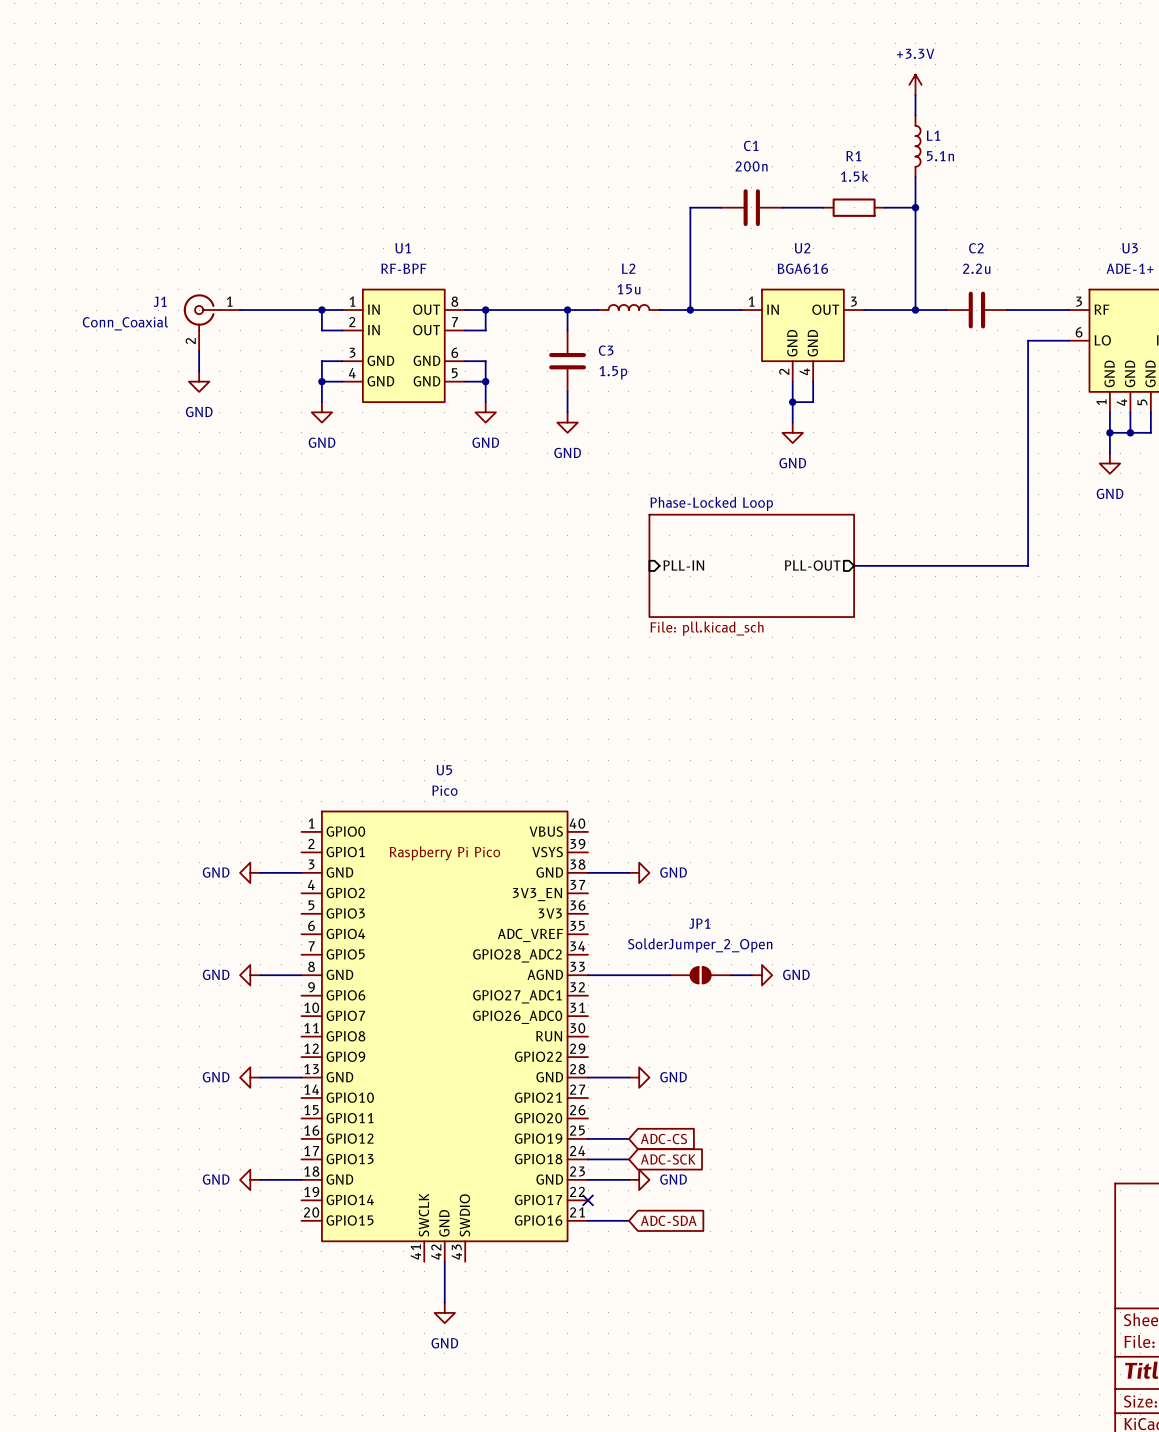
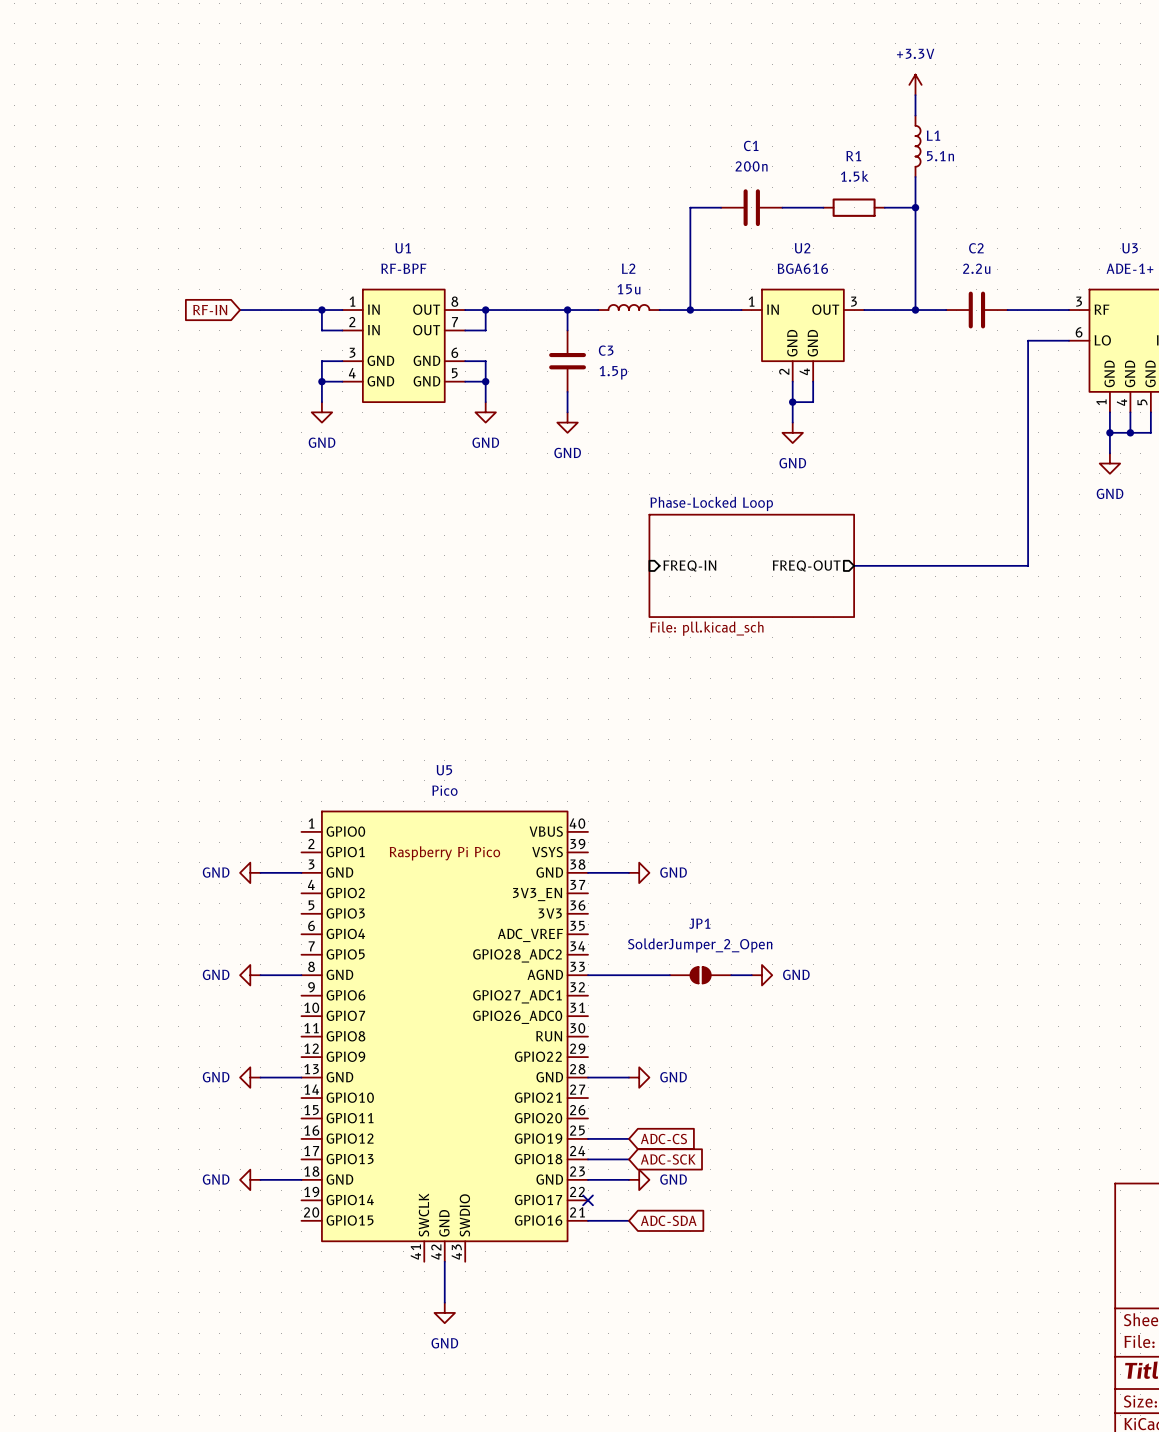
global label: none -> RF-IN (210, 310)
J1: Conn_Coaxial (211, 322) -> none
wire: (199, 350) (199, 371) -> none
power symbol: GND (199, 381) -> none
sheet pin: PLL-IN (683, 565) -> FREQ-IN (689, 565)
sheet pin: PLL-OUT (812, 565) -> FREQ-OUT (806, 565)

